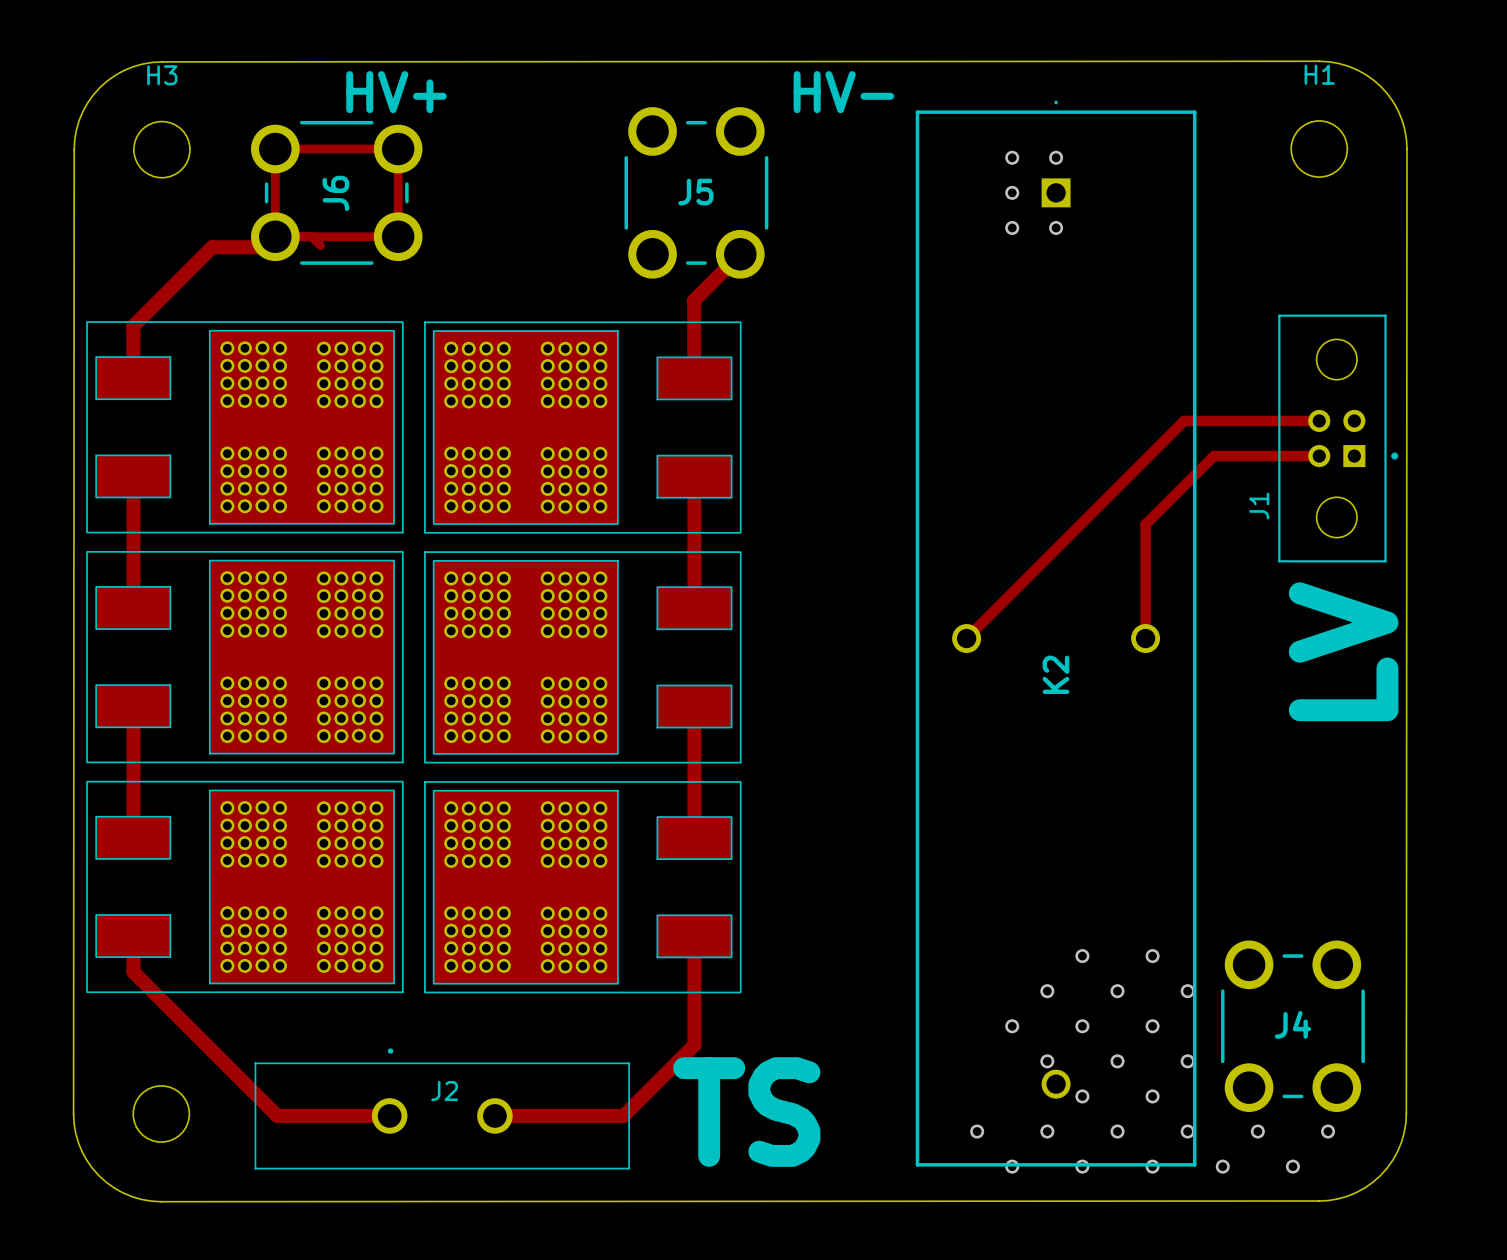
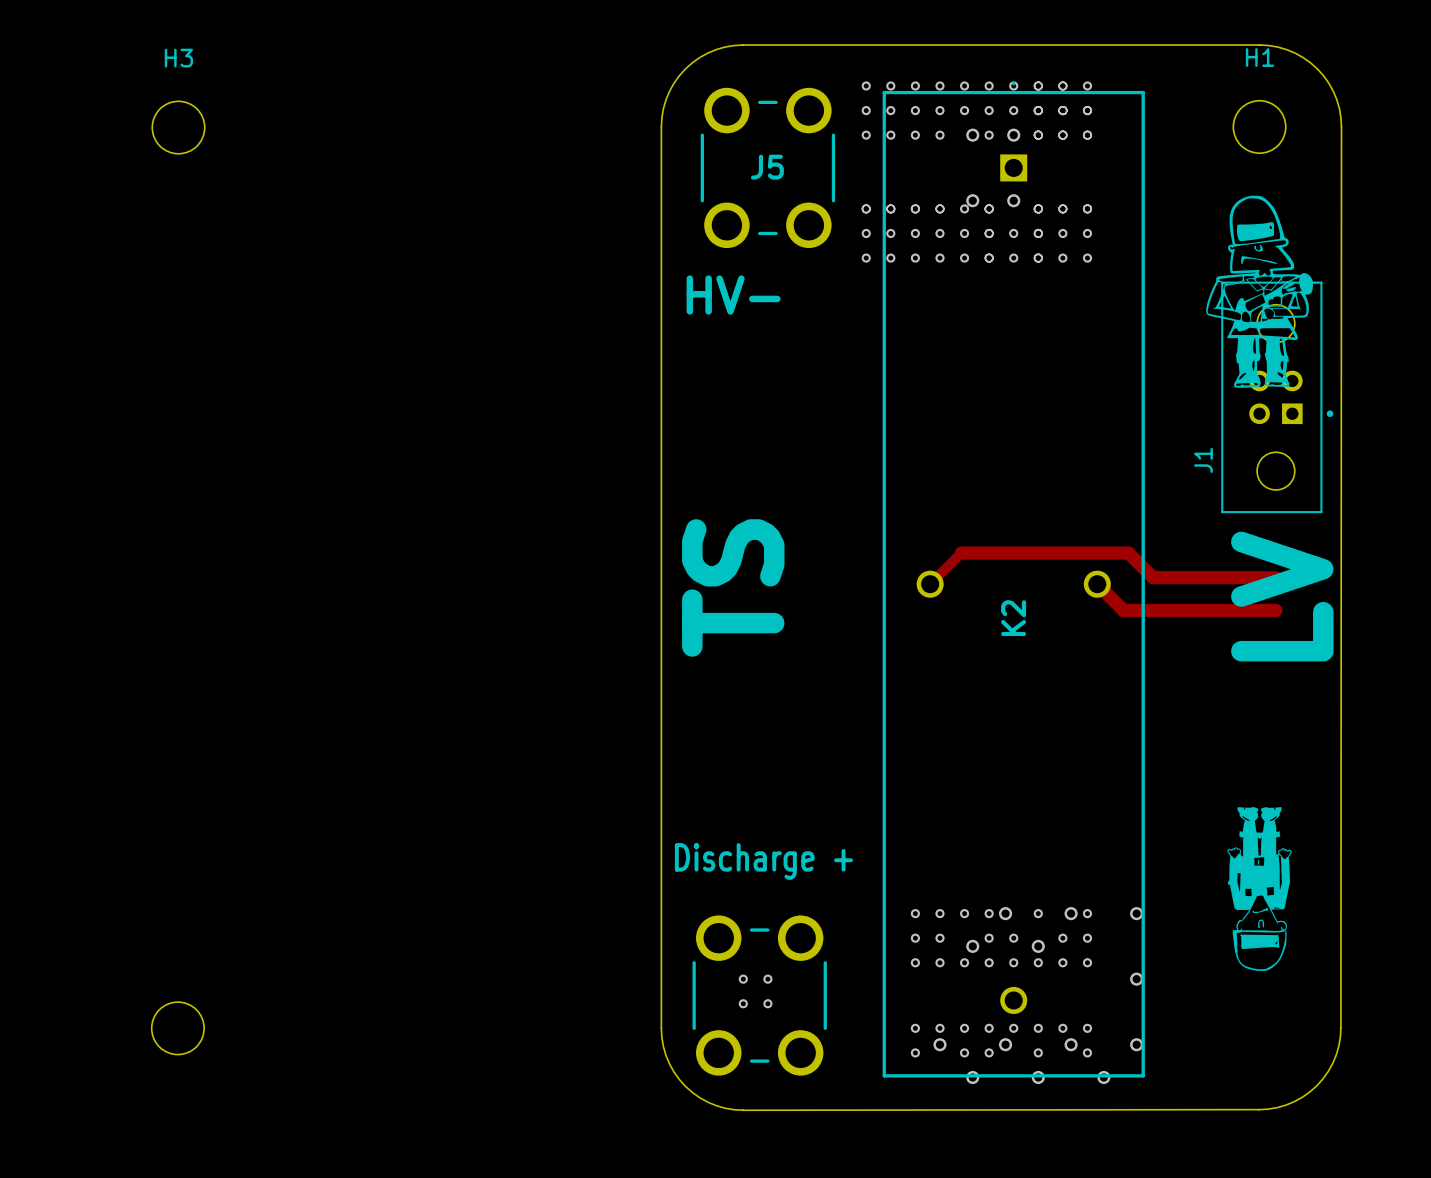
board edge: (1319, 61) (161, 61) (132, 66) (107, 81) (93, 94) (82, 111) (76, 130) (74, 149) (73, 1113) (75, 1133) (82, 1152) (99, 1176) (123, 1193) (151, 1201) (1318, 1201) -> (1259, 45) (734, 45) (716, 49) (699, 57) (679, 75) (665, 99) (661, 126) (661, 1028) (665, 1055) (673, 1071) (685, 1086) (699, 1097) (716, 1105) (734, 1109) (1258, 1109)
text: HV+ (396, 92) -> none
text position: HV- (843, 92) -> HV- (733, 295)
via: none -> (866, 85)
via: none -> (890, 85)
via: none -> (915, 85)
via: none -> (939, 85)
via: none -> (964, 85)
via: none -> (989, 85)
via: none -> (1013, 85)
via: none -> (1038, 85)
via: none -> (1062, 85)
via: none -> (1087, 85)
via: none -> (866, 110)
via: none -> (890, 110)
via: none -> (915, 110)
via: none -> (939, 110)
via: none -> (964, 110)
via: none -> (989, 110)
via: none -> (1013, 110)
via: none -> (1038, 110)
via: none -> (1062, 110)
via: none -> (1087, 110)
via: none -> (866, 135)
via: none -> (890, 135)
via: none -> (915, 135)
via: none -> (939, 135)
via: none -> (989, 135)
via: none -> (1038, 135)
via: none -> (1062, 135)
via: none -> (1087, 135)
J6: (336, 192) -> none
J5 position: (696, 192) -> (767, 167)
via: (1012, 192) -> none
drawing: none -> [1206, 195, 1313, 388]
track: (275, 236) (398, 236) (398, 149) (275, 149) (275, 236) -> none
track: (275, 236) (264, 247) (212, 247) (133, 326) (133, 377) -> none
track: (311, 236) (320, 245) -> none
via: none -> (866, 208)
via: none -> (890, 208)
via: none -> (915, 208)
via: none -> (939, 208)
via: none -> (964, 208)
via: none -> (989, 208)
via: none -> (1038, 208)
via: none -> (1062, 208)
via: none -> (1087, 208)
track: (740, 254) (694, 300) (694, 378) -> none
via: none -> (866, 233)
via: none -> (890, 233)
via: none -> (915, 233)
via: none -> (939, 233)
via: none -> (964, 233)
via: none -> (989, 233)
via: none -> (1013, 233)
via: none -> (1038, 233)
via: none -> (1062, 233)
via: none -> (1087, 233)
via: none -> (866, 258)
via: none -> (890, 258)
via: none -> (915, 258)
via: none -> (939, 258)
via: none -> (964, 258)
via: none -> (989, 258)
via: none -> (1013, 258)
via: none -> (1038, 258)
via: none -> (1062, 258)
via: none -> (1087, 258)
track: (1319, 420) (1184, 420) (999, 605) -> (1275, 577) (1153, 577) (1128, 553) (961, 553)
part: (244, 427) -> none
part: (582, 427) -> none
track: (1319, 456) (1213, 456) (1145, 524) (1145, 638) -> (1275, 610) (1123, 610) (1097, 584)
track: (133, 476) (133, 607) -> none
track: (694, 476) (694, 608) -> none
text: none -> TS (733, 587)
part: (244, 657) -> none
part: (582, 657) -> none
track: (133, 706) (133, 837) -> none
track: (694, 706) (694, 838) -> none
drawing: none -> [1227, 807, 1292, 971]
part: (244, 886) -> none
part: (582, 887) -> none
track: (133, 935) (133, 972) (277, 1115) (389, 1115) -> none
text: none -> Discharge + (763, 861)
track: (694, 936) (694, 1045) (623, 1115) (494, 1115) -> none
via: (1082, 956) -> none
via: (1152, 956) -> none
via: none -> (915, 913)
via: none -> (939, 913)
via: none -> (964, 913)
via: none -> (989, 913)
via: none -> (1038, 913)
via: none -> (1087, 913)
via: none -> (915, 938)
via: none -> (939, 938)
via: none -> (989, 938)
via: none -> (1013, 938)
via: none -> (1062, 938)
via: none -> (1087, 938)
via: (1152, 1026) -> none
J4: (1292, 1026) -> none
via: none -> (915, 962)
via: none -> (939, 962)
via: none -> (964, 962)
via: none -> (989, 962)
via: none -> (1013, 962)
via: none -> (1038, 962)
via: none -> (1062, 962)
via: none -> (1087, 962)
via: none -> (743, 979)
via: none -> (767, 979)
via: (1047, 1061) -> none
via: (1117, 1061) -> none
part: none -> (759, 995)
via: none -> (743, 1003)
via: none -> (767, 1003)
text: J2 (444, 1090) -> none
via: (1082, 1096) -> none
via: (1152, 1096) -> none
part: (442, 1108) -> none
text: TS (746, 1112) -> none
via: none -> (915, 1028)
via: none -> (939, 1028)
via: none -> (964, 1028)
via: none -> (989, 1028)
via: none -> (1013, 1028)
via: none -> (1038, 1028)
via: none -> (1062, 1028)
via: none -> (1087, 1028)
via: (1257, 1131) -> none
via: (1328, 1131) -> none
via: none -> (915, 1052)
via: none -> (964, 1052)
via: none -> (989, 1052)
via: none -> (1038, 1052)
via: none -> (1087, 1052)
via: (1222, 1166) -> none
via: (1292, 1166) -> none

